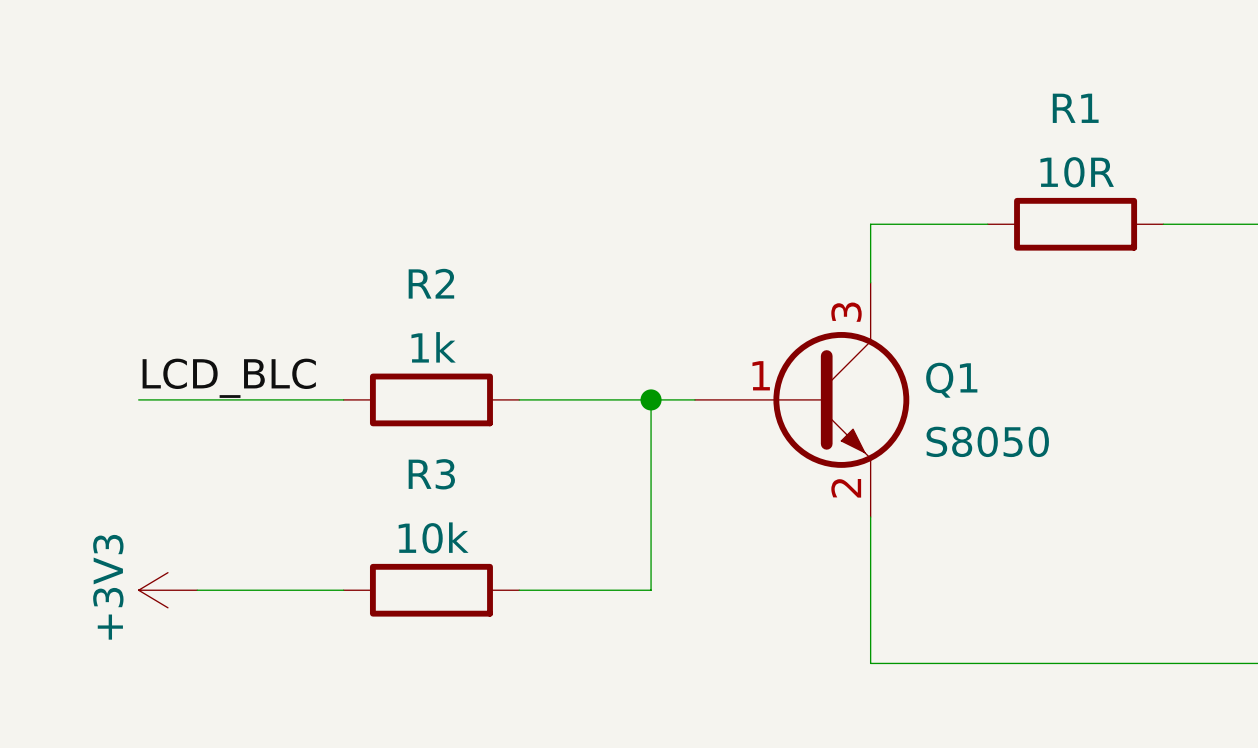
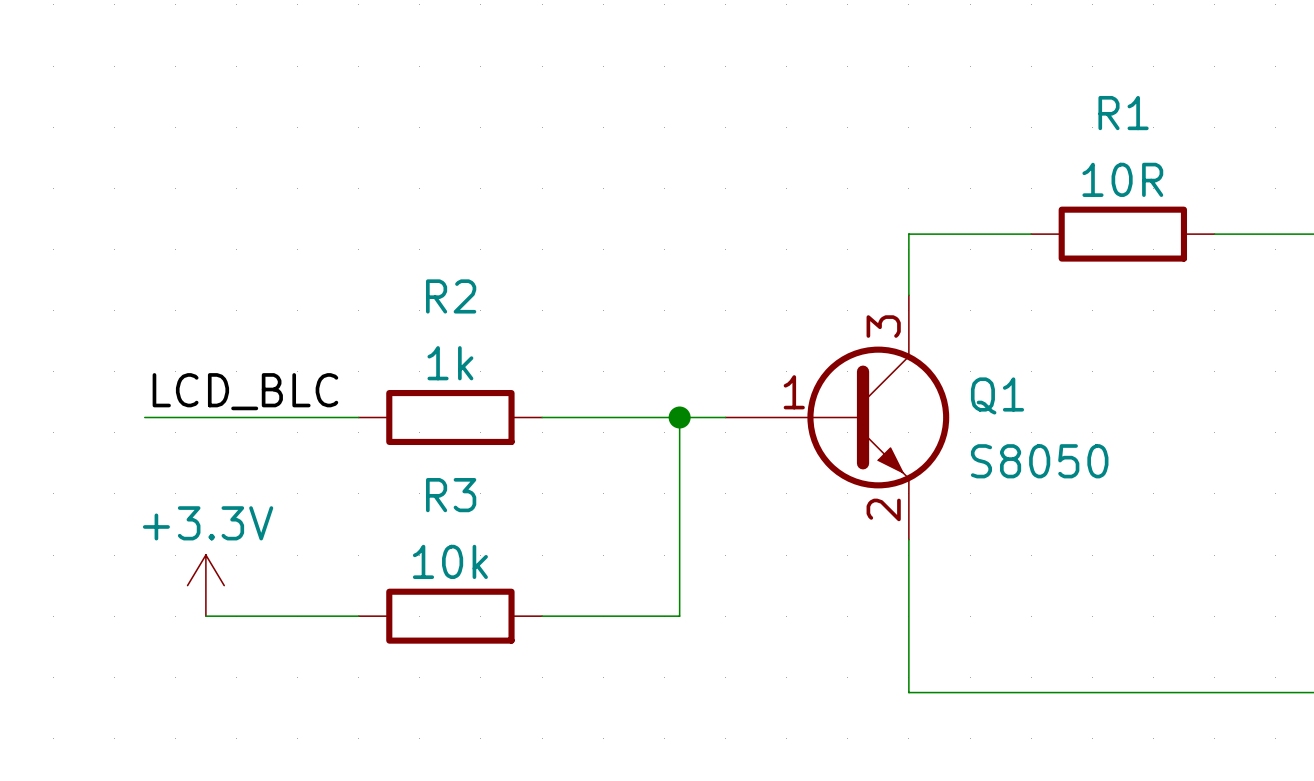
power symbol: none -> +3.3V (205, 585)
power symbol: +3V3 (167, 590) -> none

